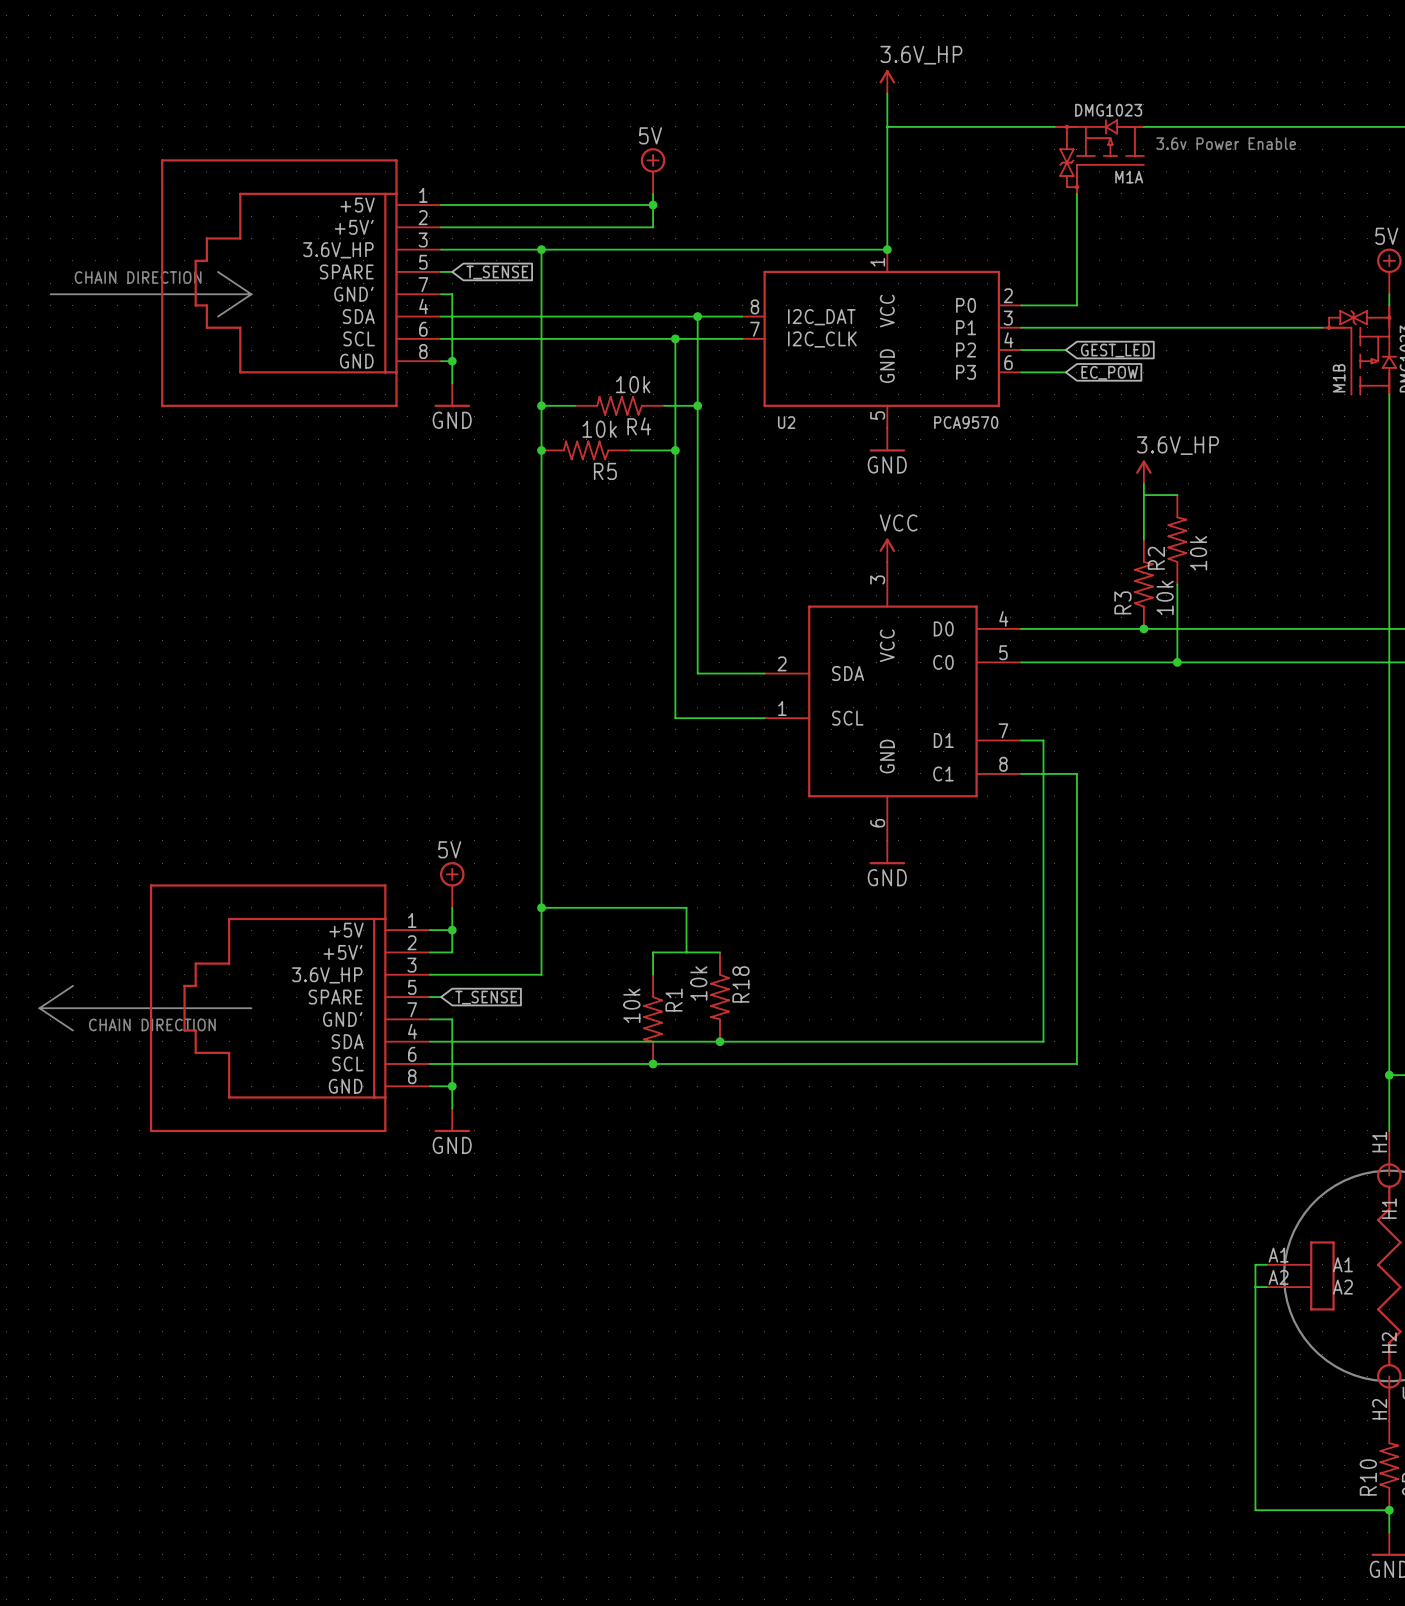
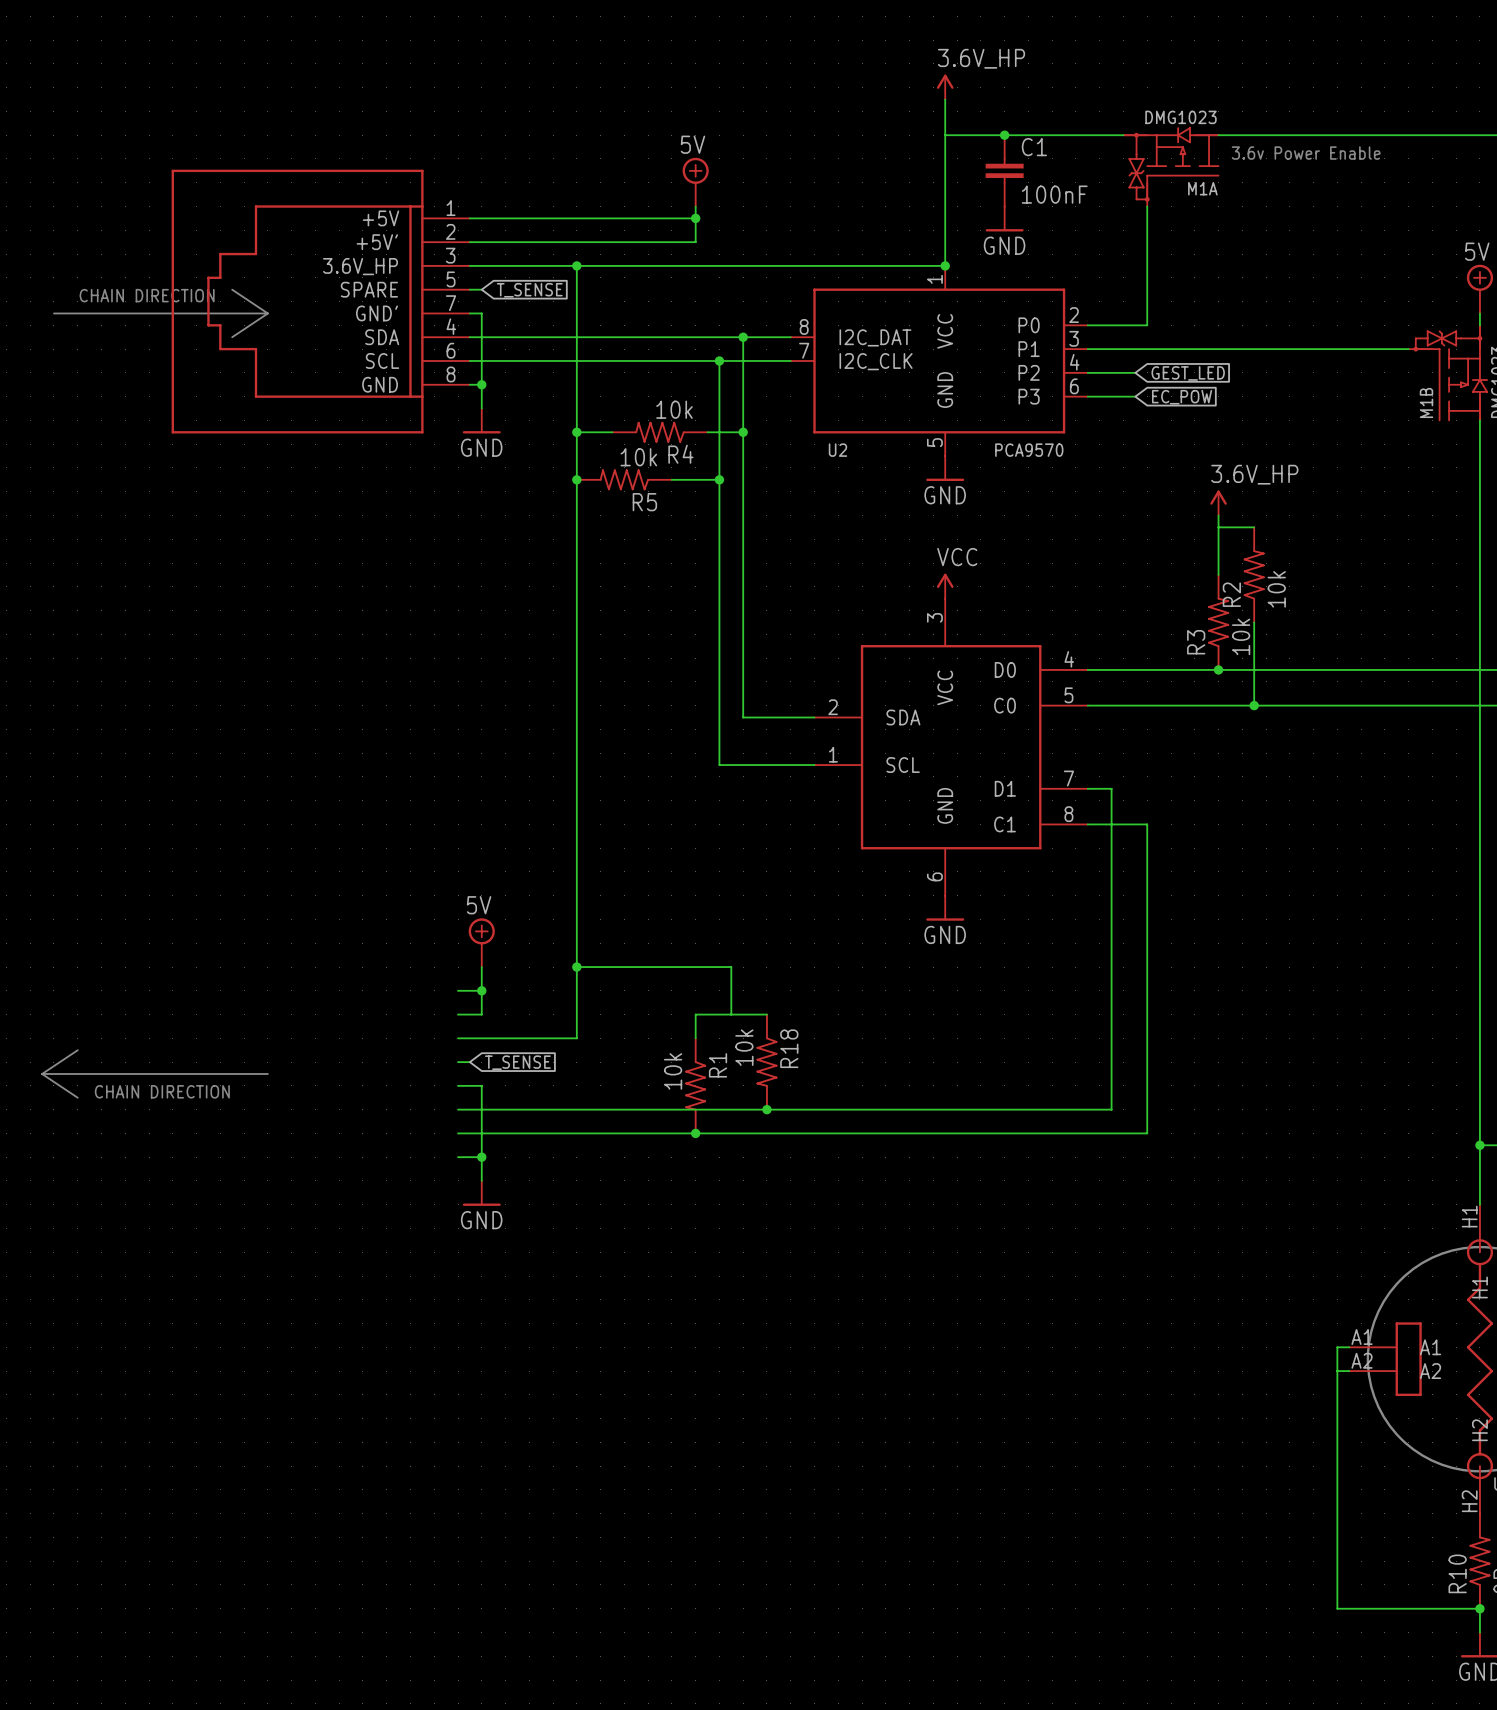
junction: none -> (1004, 135)
C1: none -> 100nF (1004, 170)
power symbol: none -> GND (1004, 218)
part: (289, 1008) -> none

